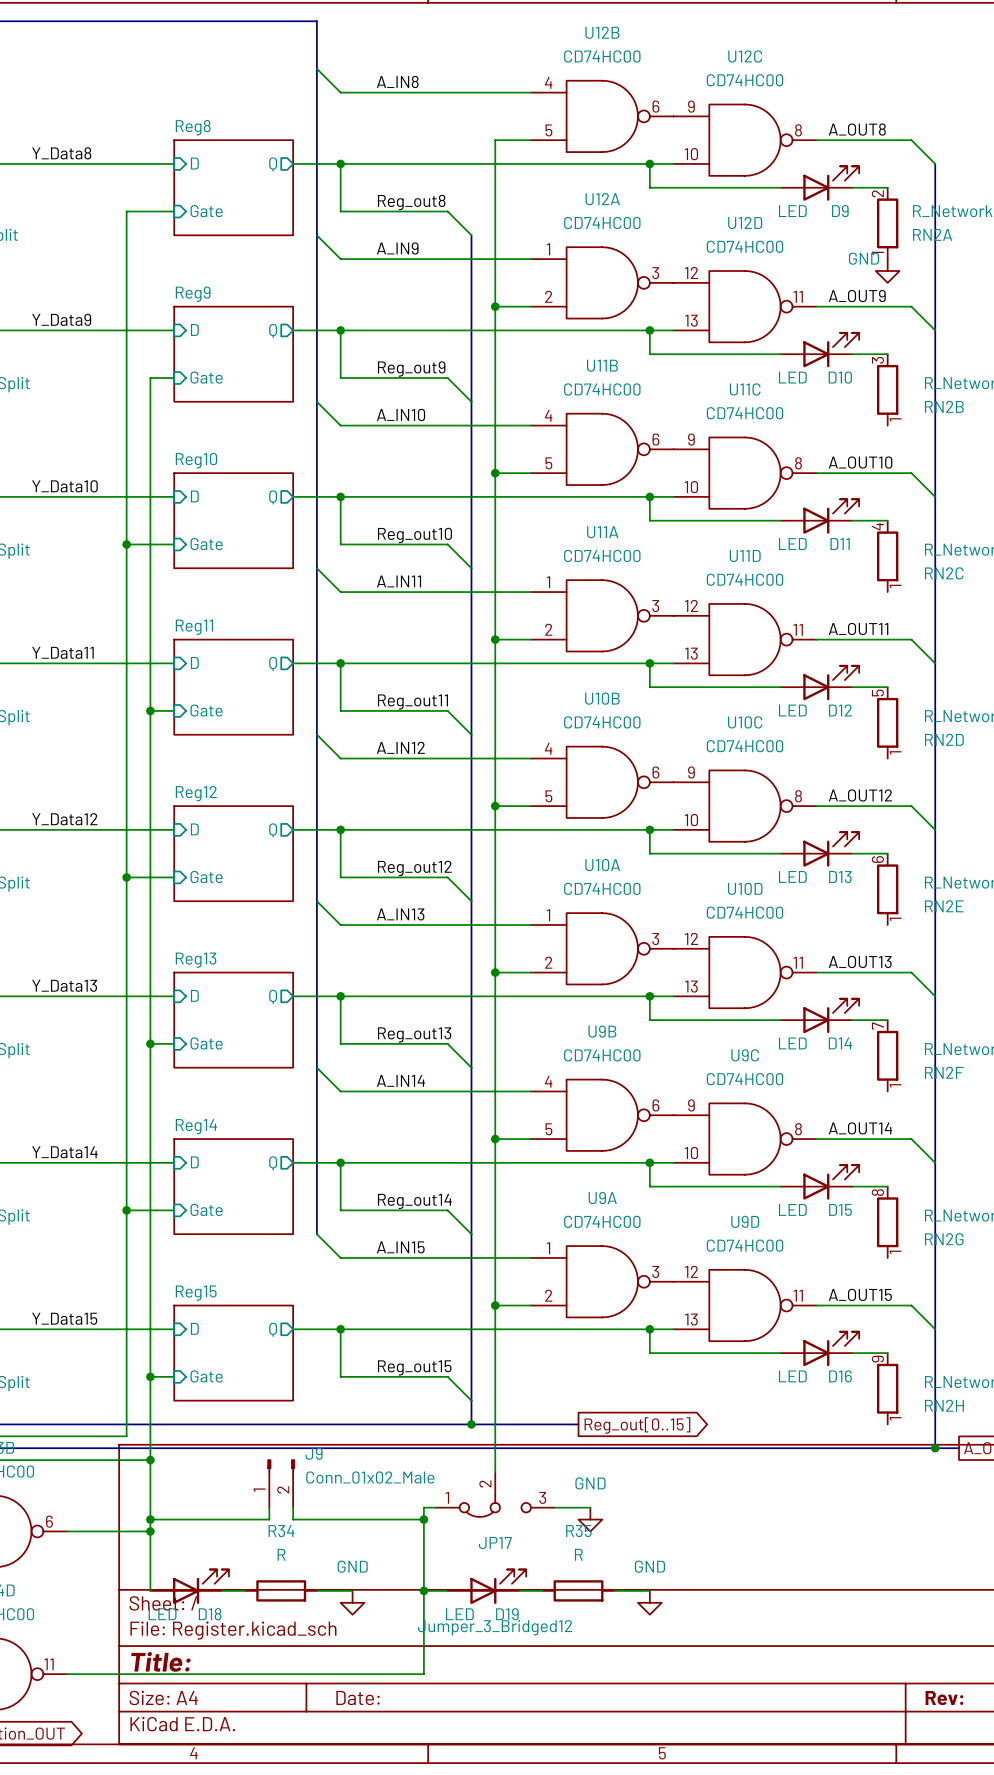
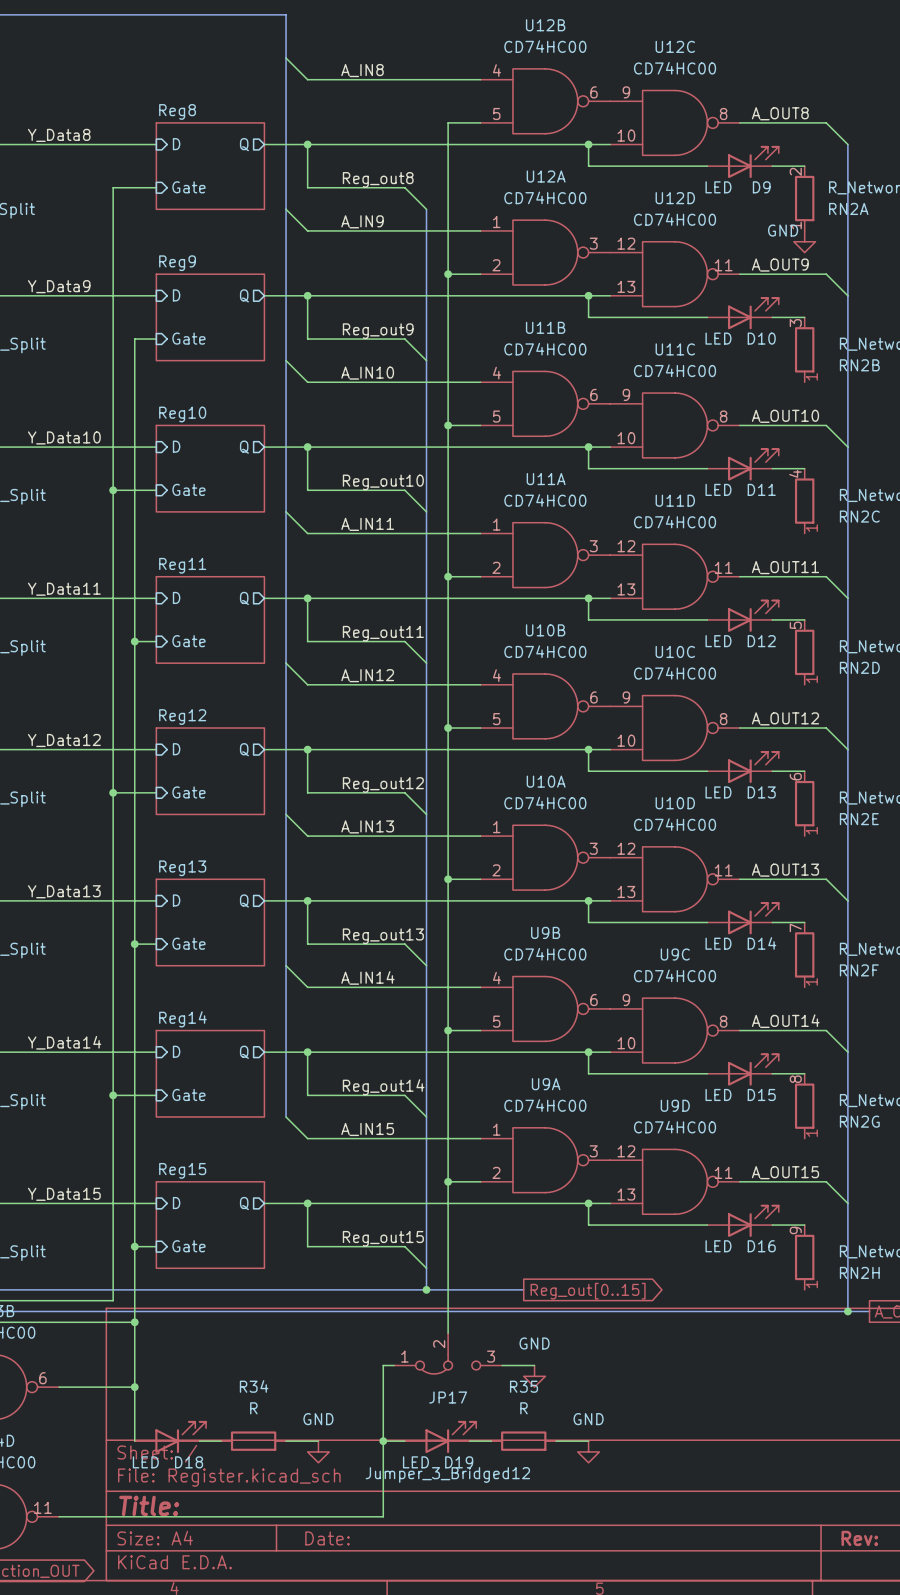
J9: Conn_01x02_Male (281, 1483) -> none
wire: (269, 1507) (269, 1519) (150, 1519) -> none
wire: (293, 1507) (293, 1519) (423, 1519) -> none
junction: (150, 1519) -> none
junction: (423, 1519) -> none

